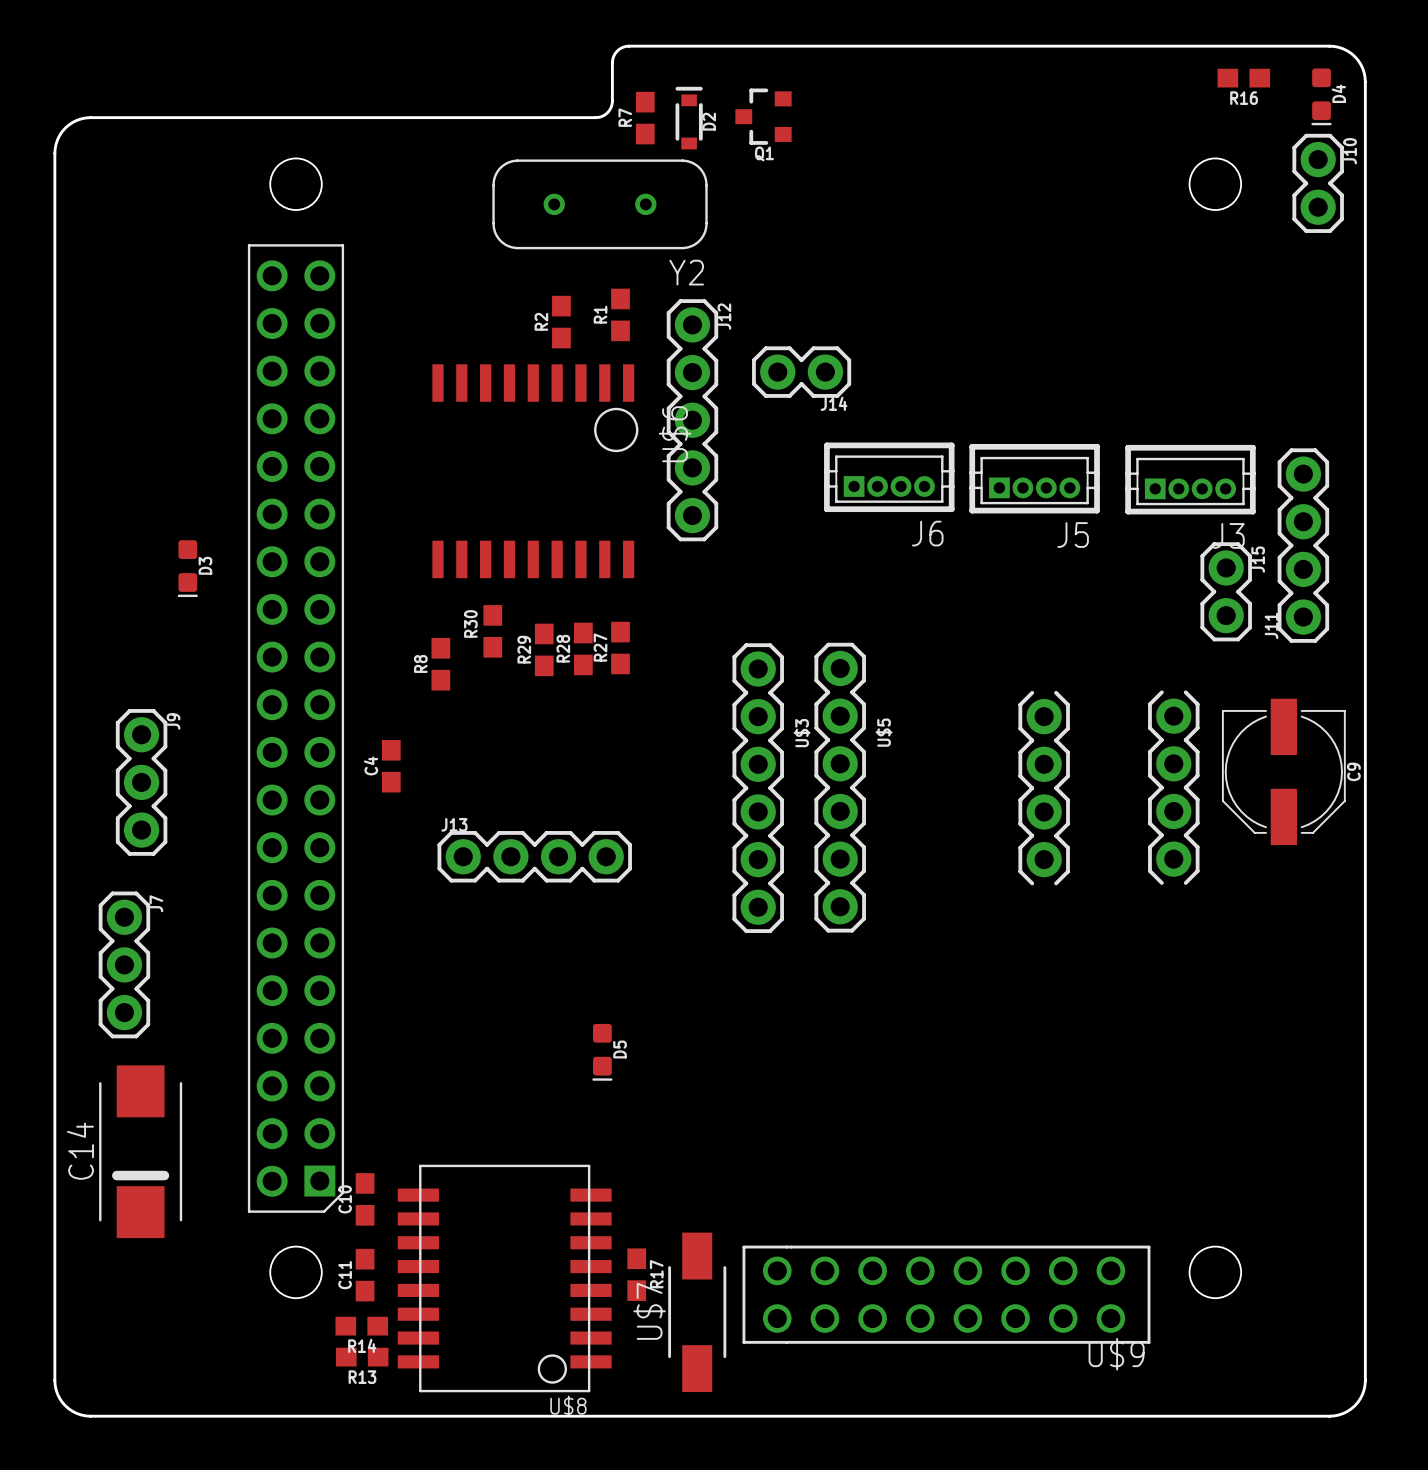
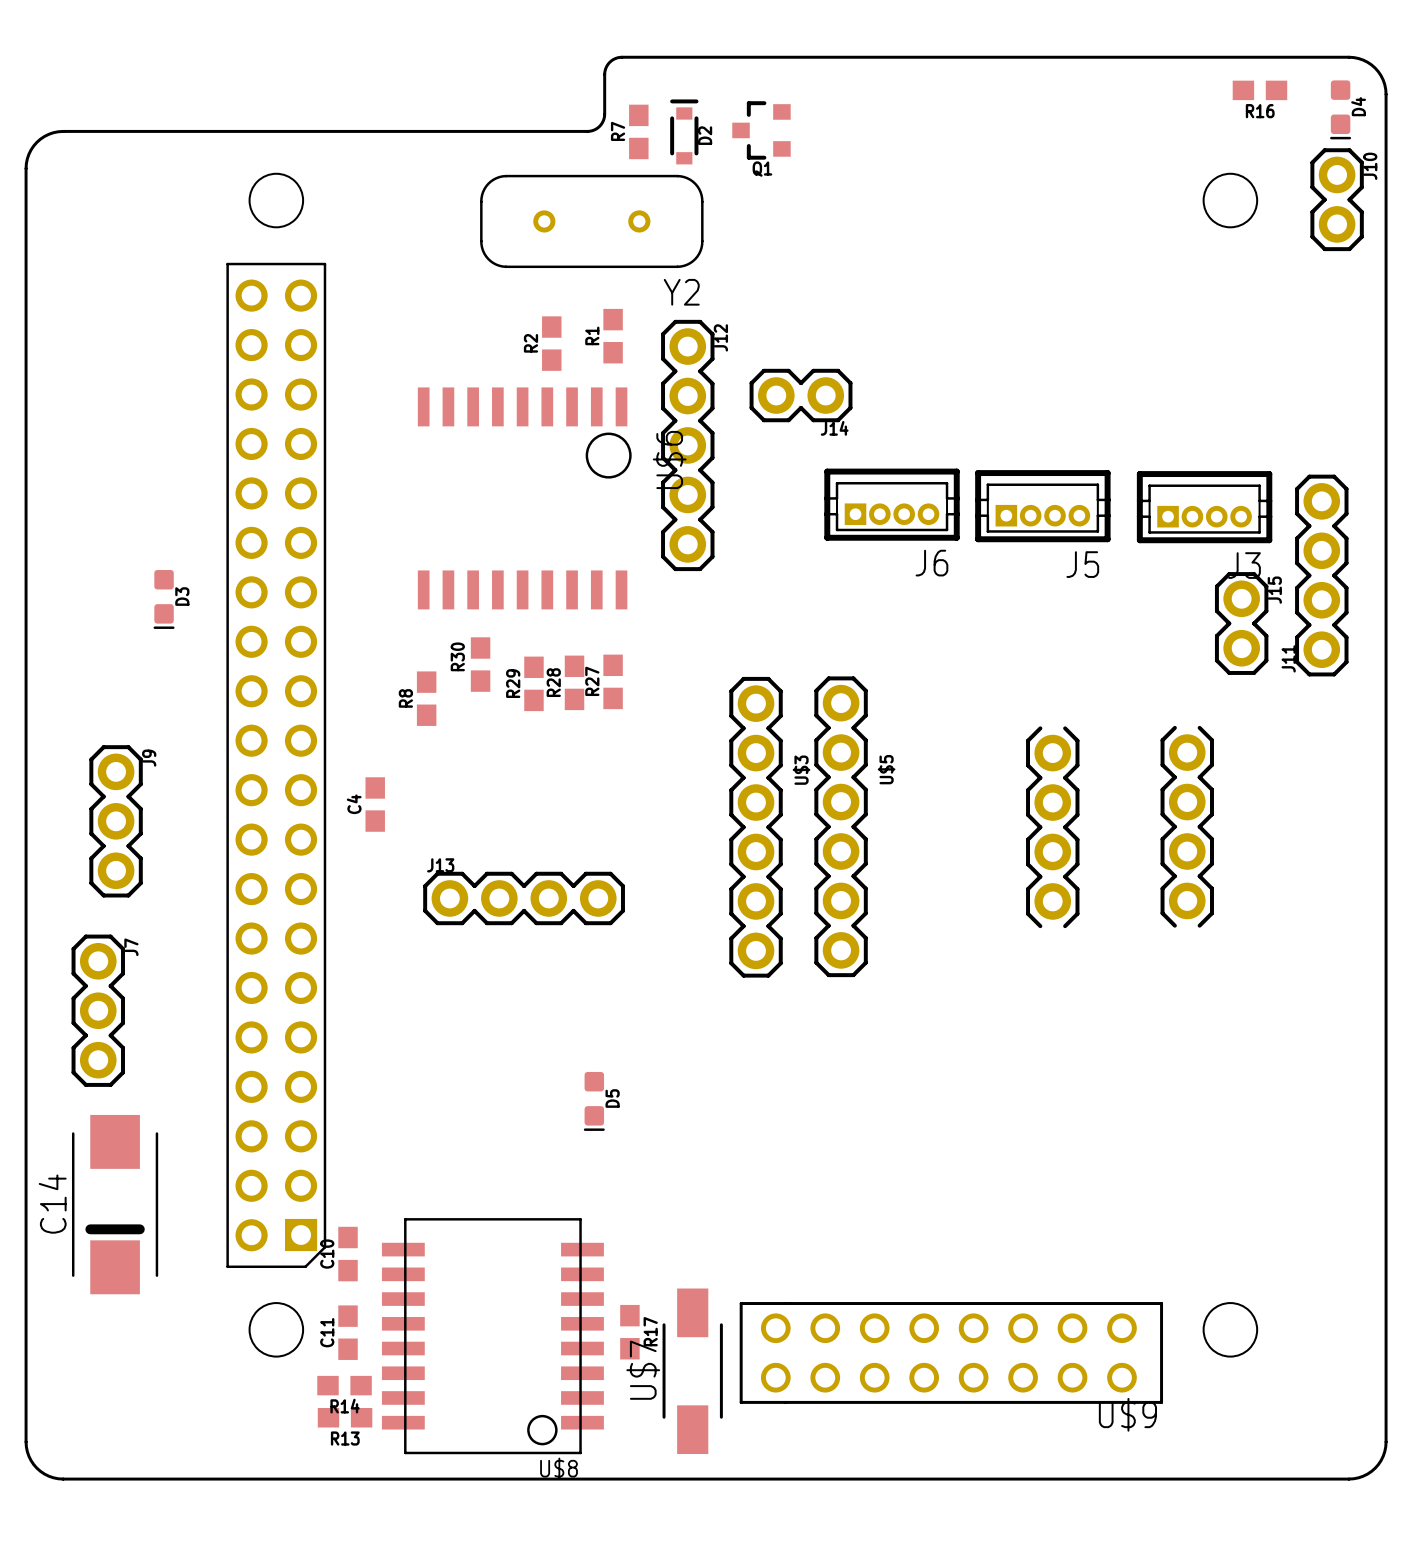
C9: (1283, 771) -> none

